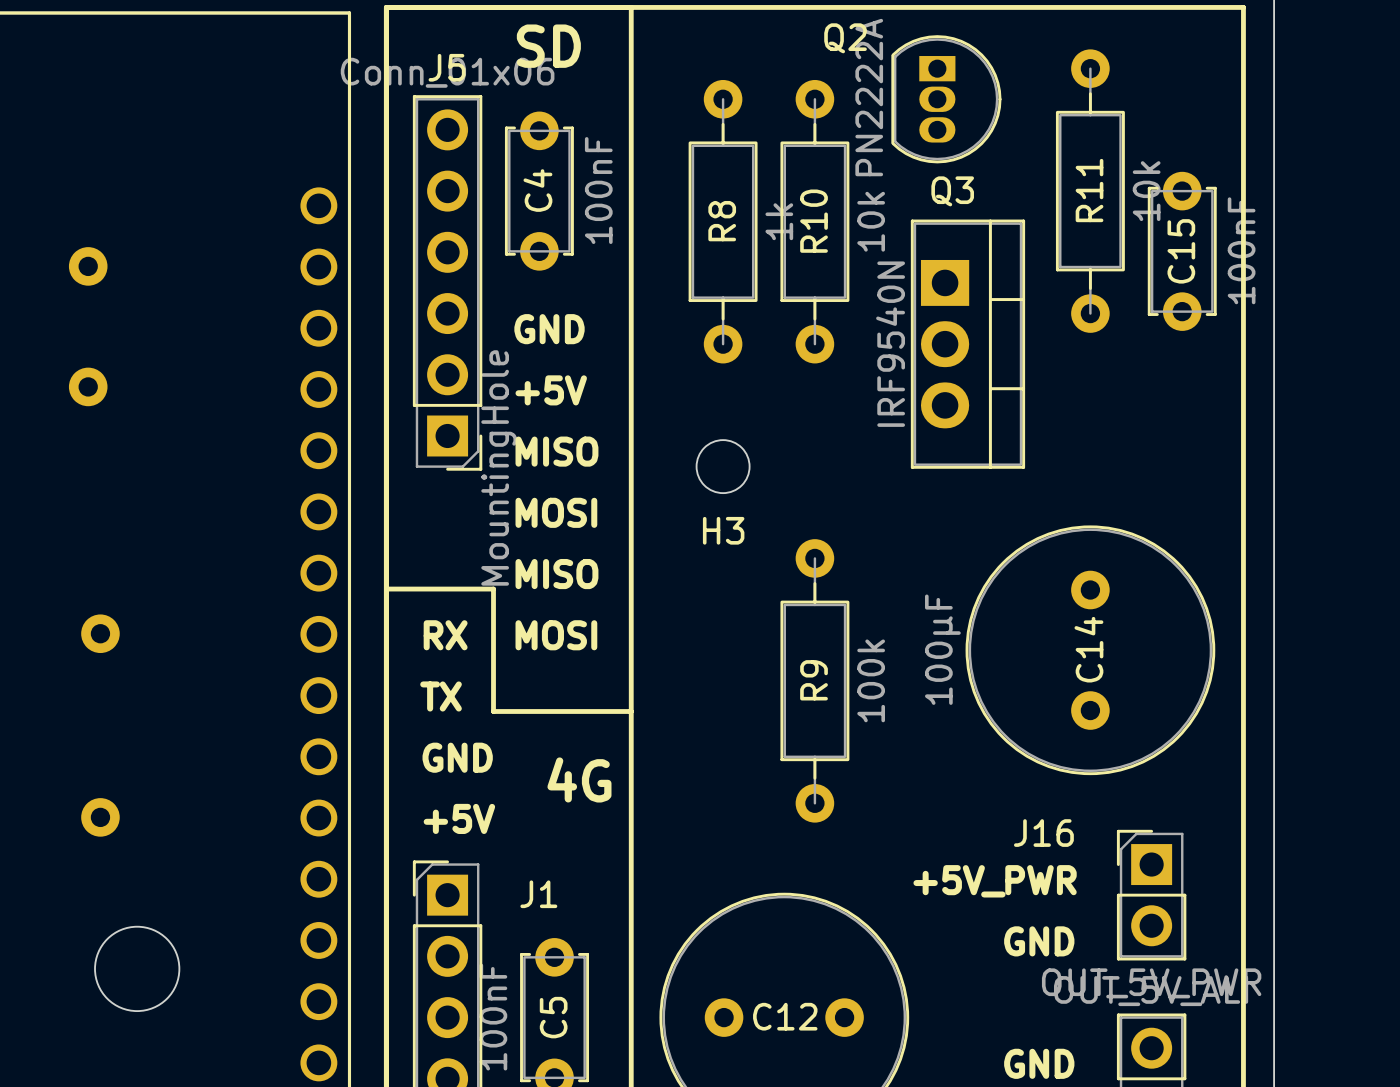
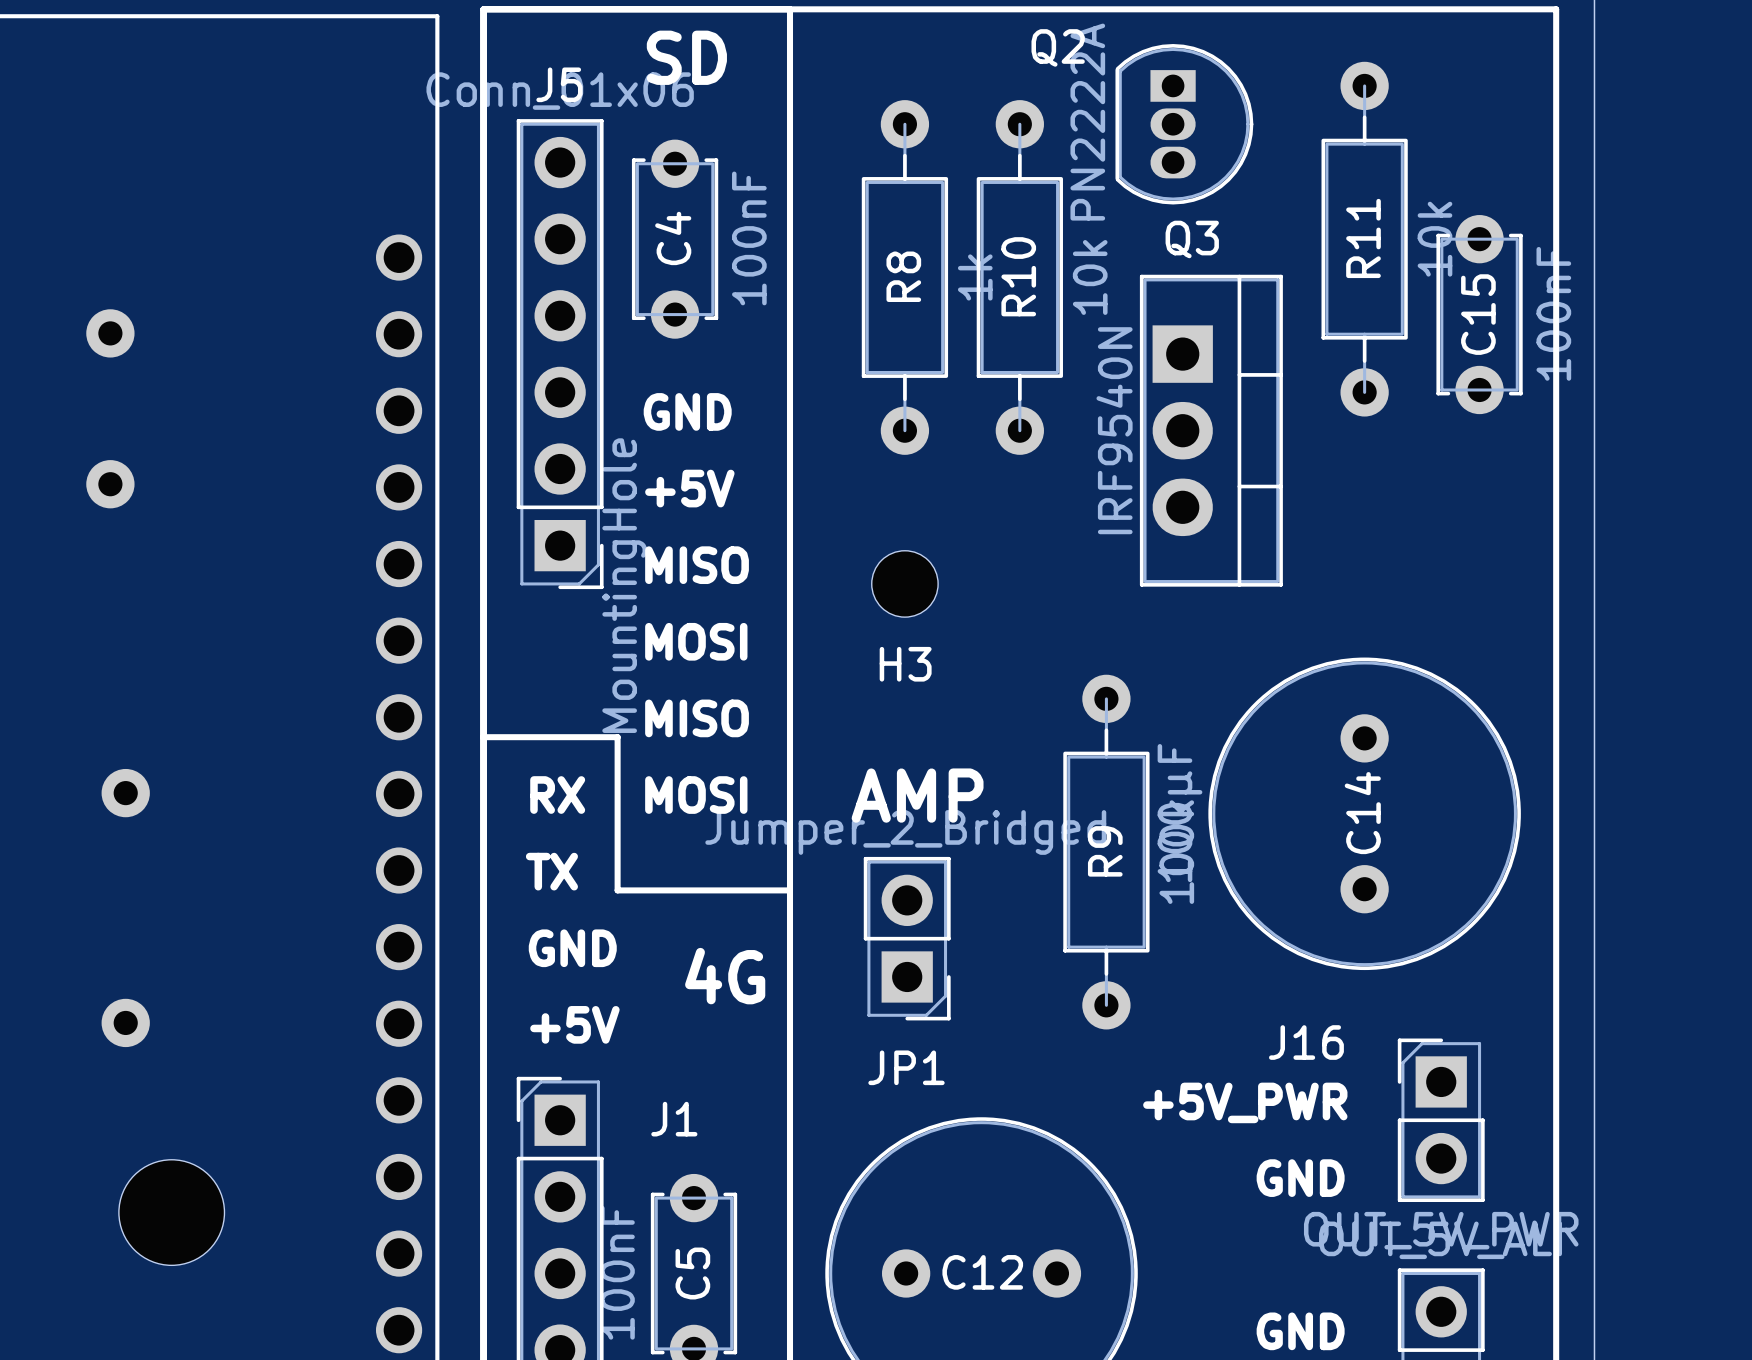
text: none -> AMP (917, 795)
R9 position: (814, 680) -> (1106, 852)
JP1: none -> Jumper_2_Bridged (907, 938)

